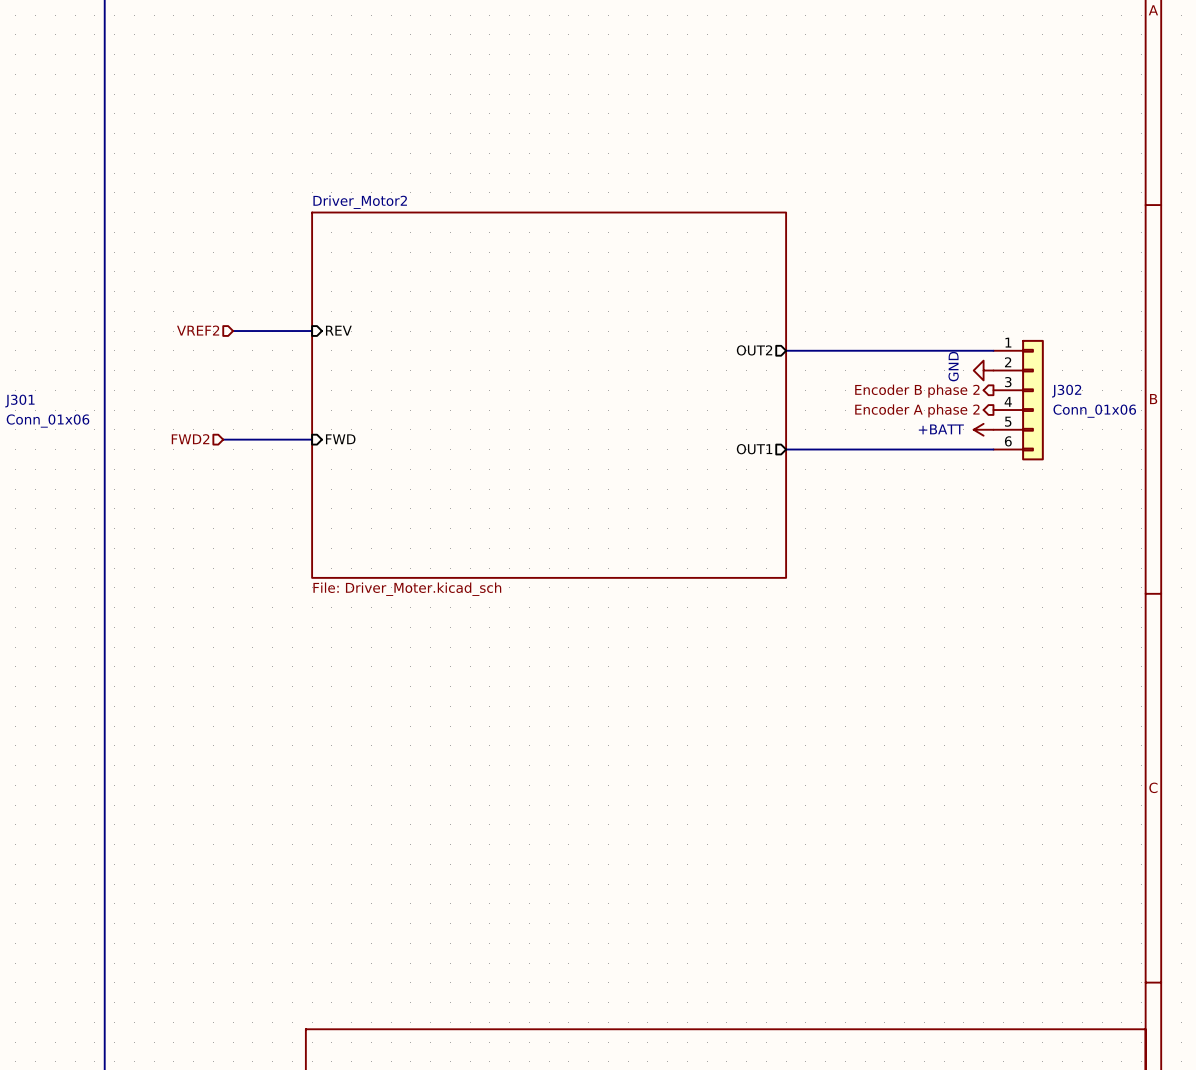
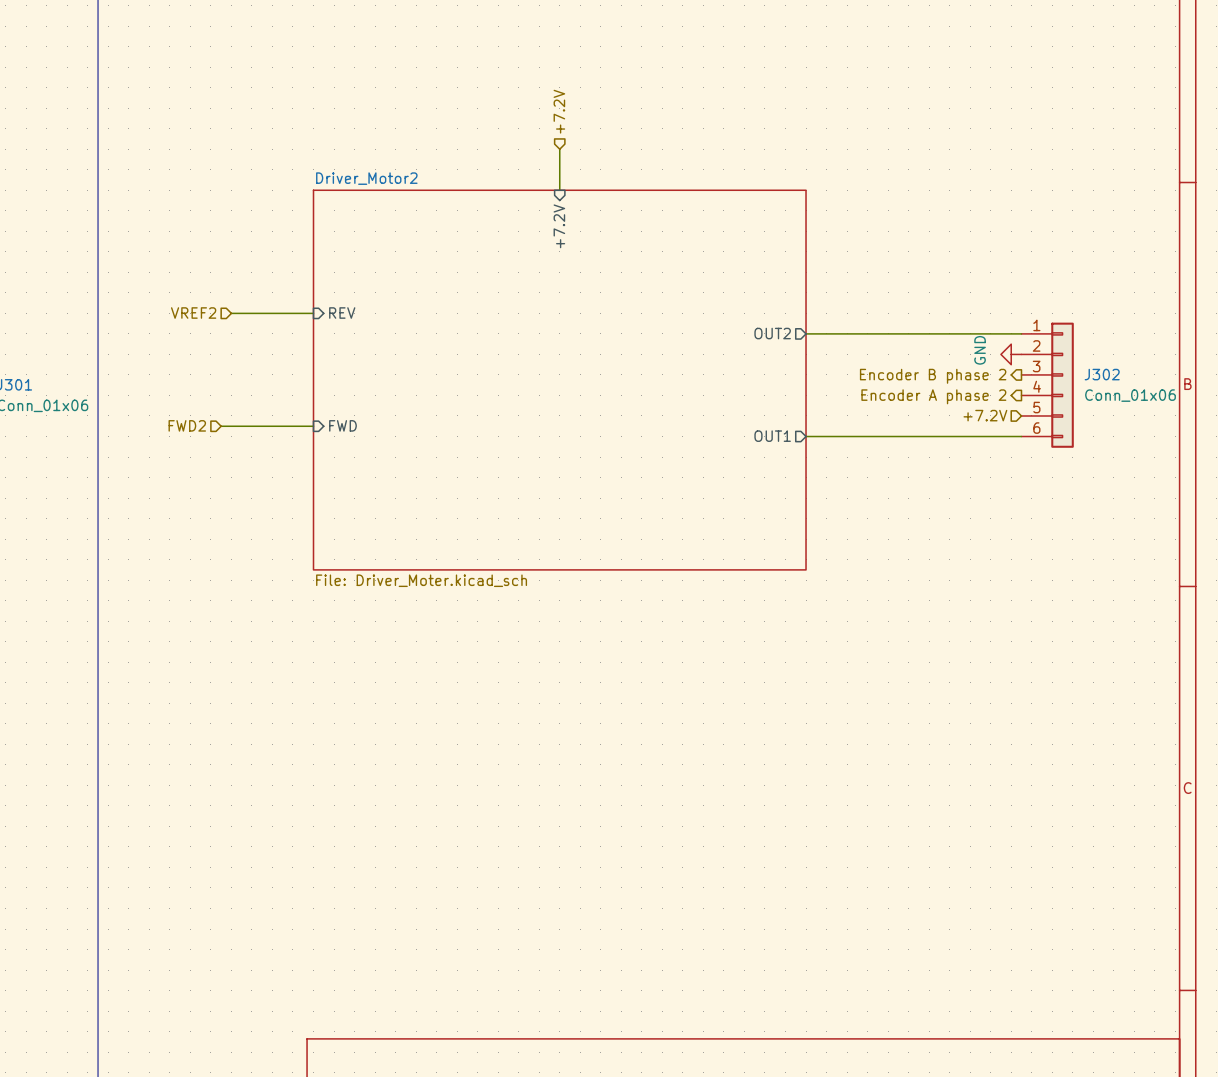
hierarchical label: none -> +7.2V (559, 111)
wire: none -> (559, 149) (559, 190)
sheet pin: none -> +7.2V (559, 226)
hierarchical label: none -> +7.2V (985, 415)
power symbol: +BATT (983, 429) -> none

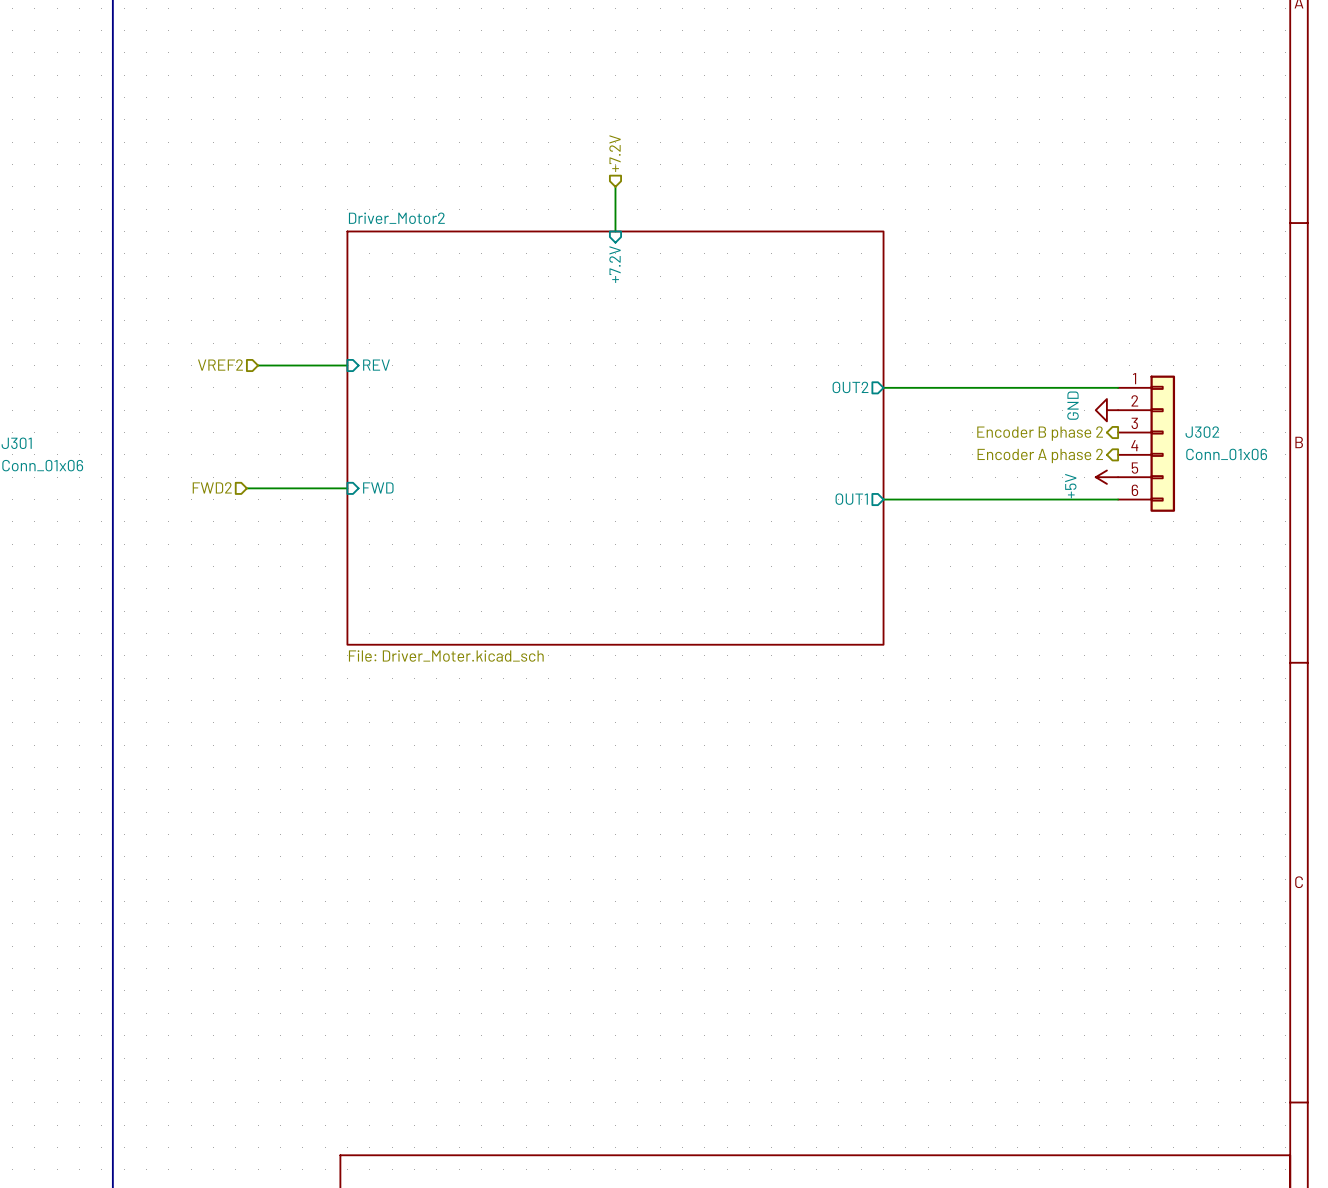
hierarchical label: +7.2V (985, 415) -> none
power symbol: none -> +5V (1106, 477)

